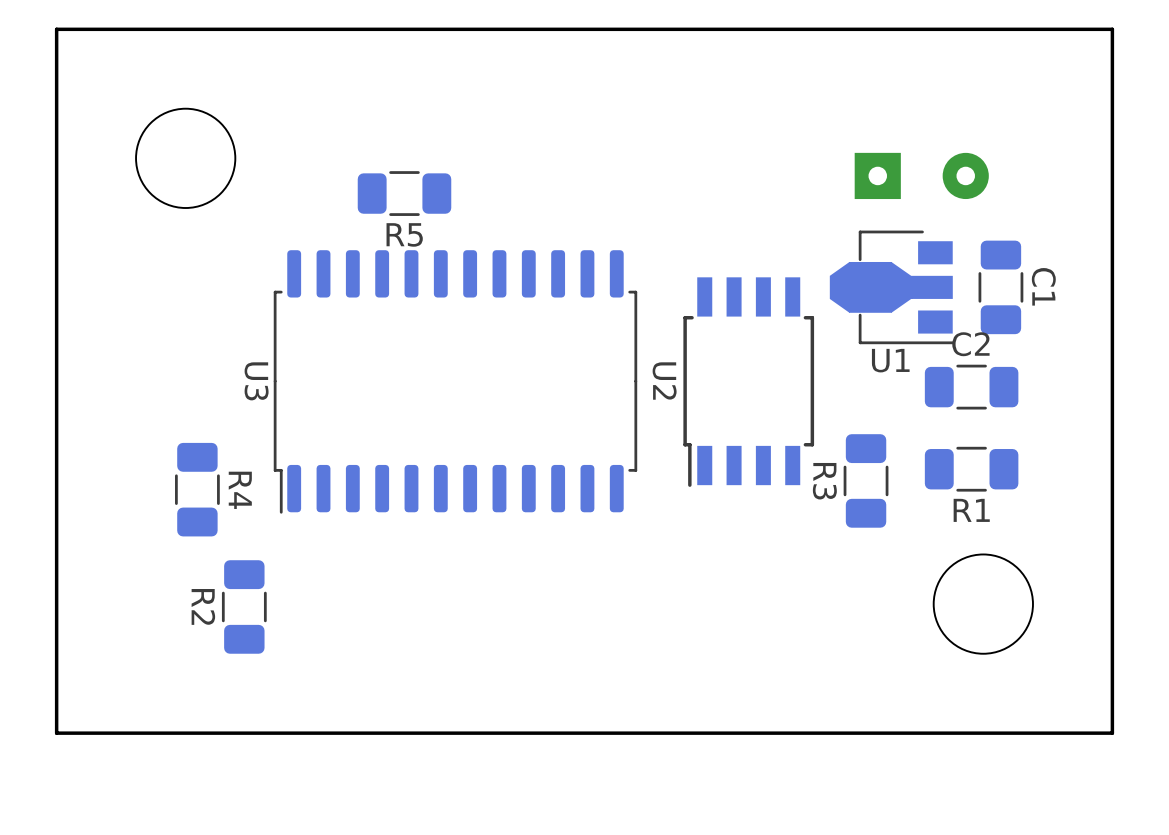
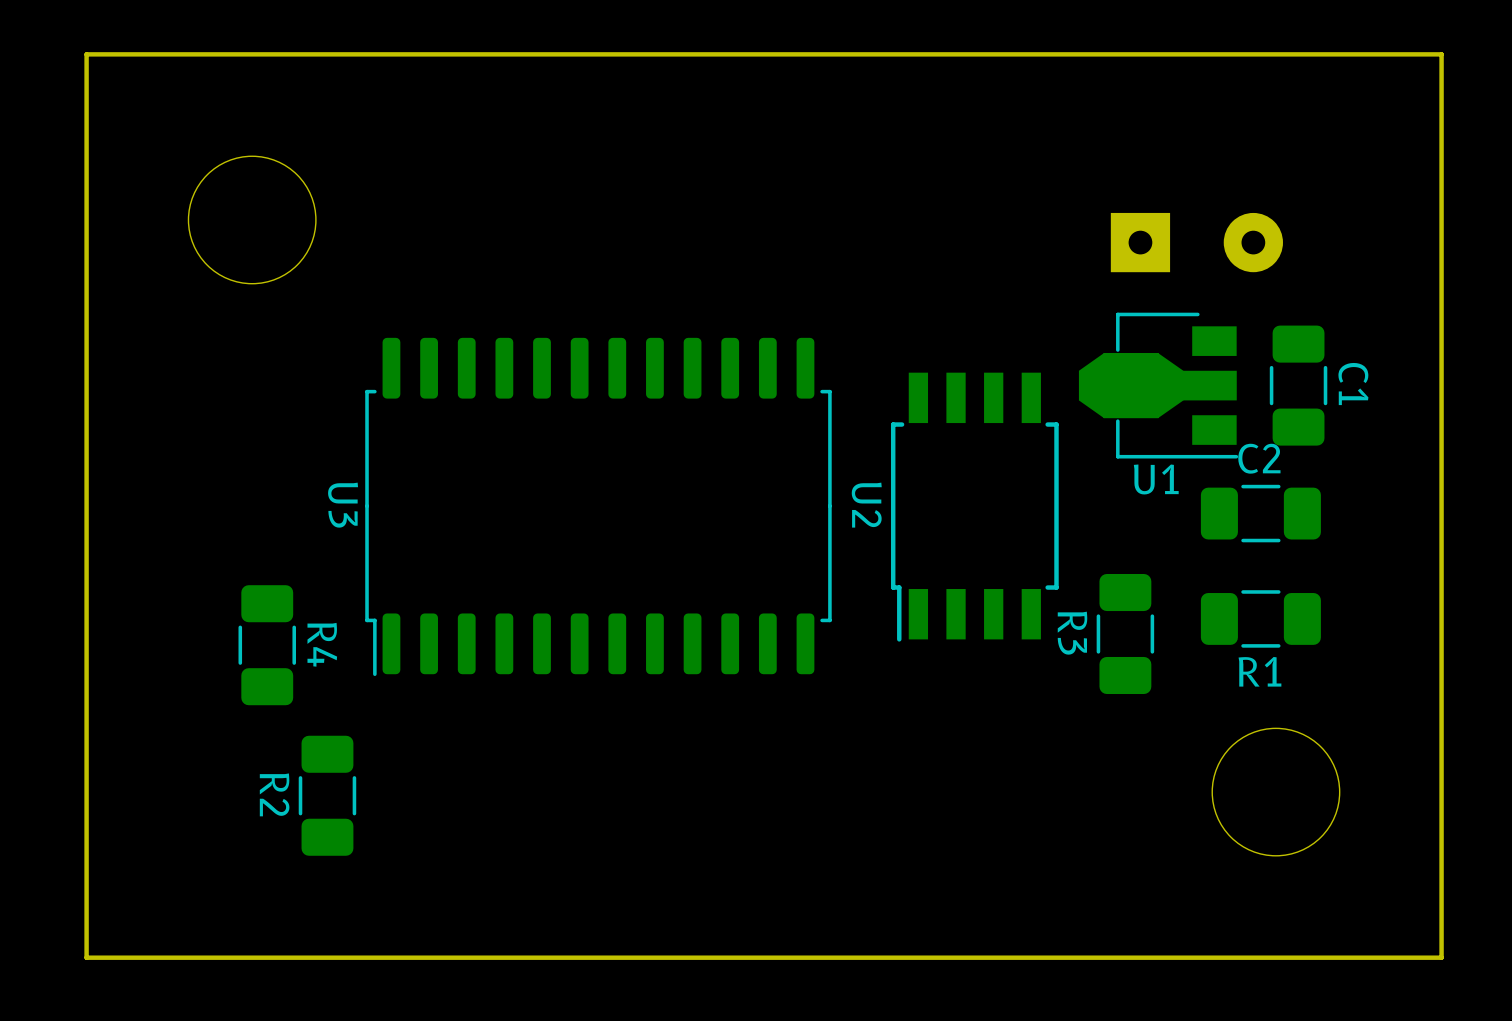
R5: (404, 193) -> none

